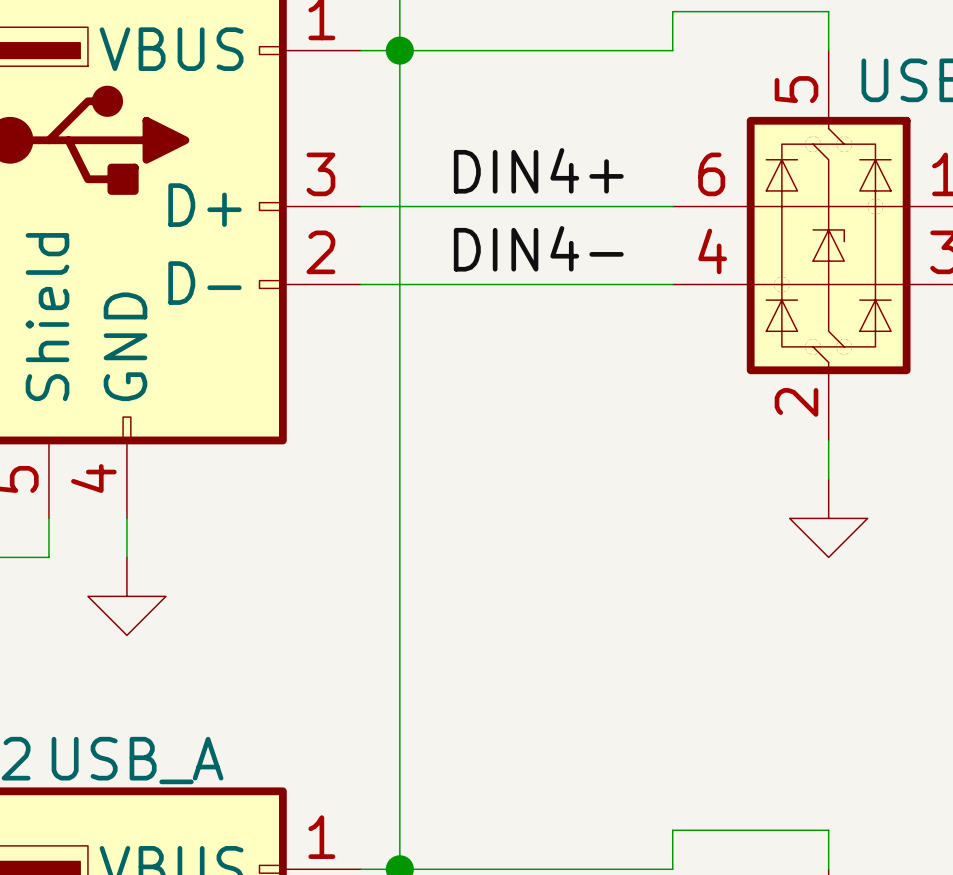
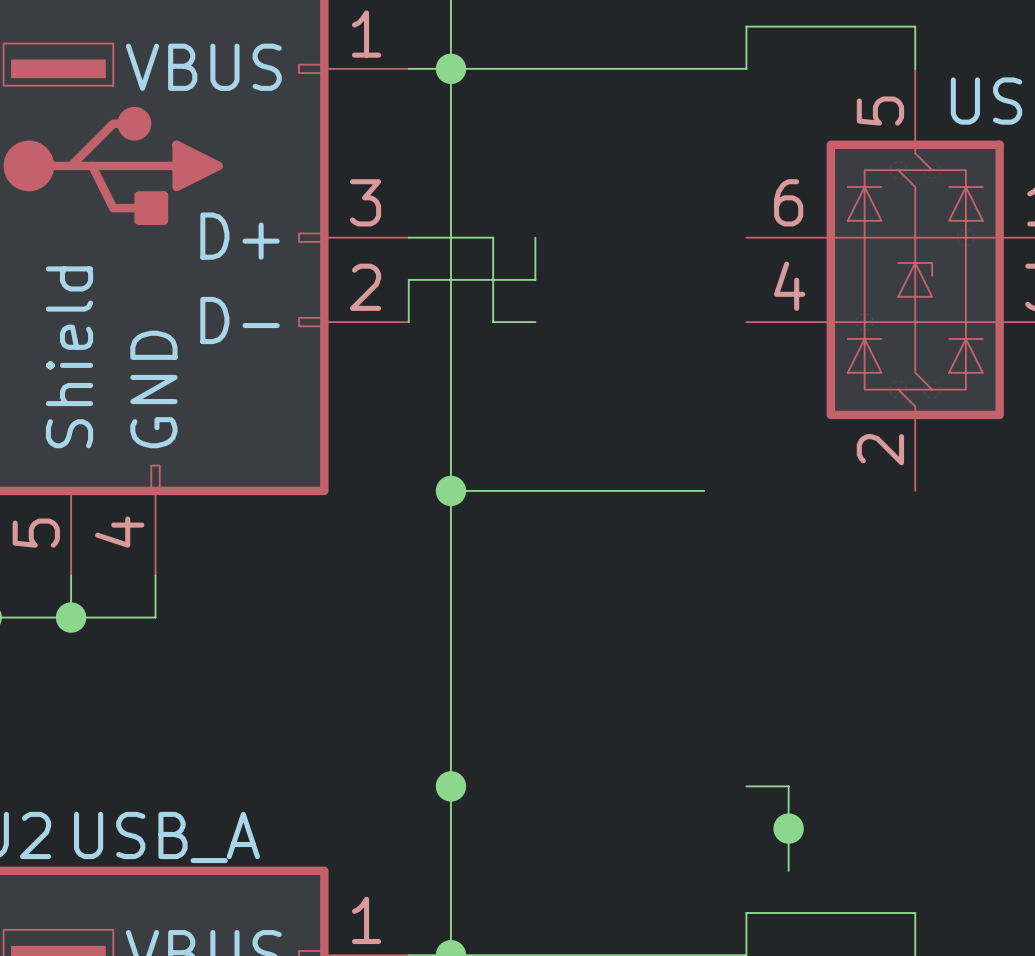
label: DIN4+ (538, 170) -> none
wire: (438, 206) (672, 206) -> (493, 237) (493, 322)
label: DIN4- (538, 248) -> none
wire: (360, 284) (438, 284) -> (408, 322) (408, 279) (535, 279) (535, 237)
wire: (477, 284) (672, 284) -> none
wire: none -> (450, 490) (704, 490)
junction: none -> (450, 490)
wire: (828, 440) (828, 479) -> none
power symbol: (828, 518) -> none
wire: none -> (71, 617) (155, 617)
junction: none -> (71, 617)
power symbol: (126, 596) -> none
junction: none -> (450, 786)
wire: none -> (746, 786) (788, 786) (788, 870)
junction: none -> (788, 828)

